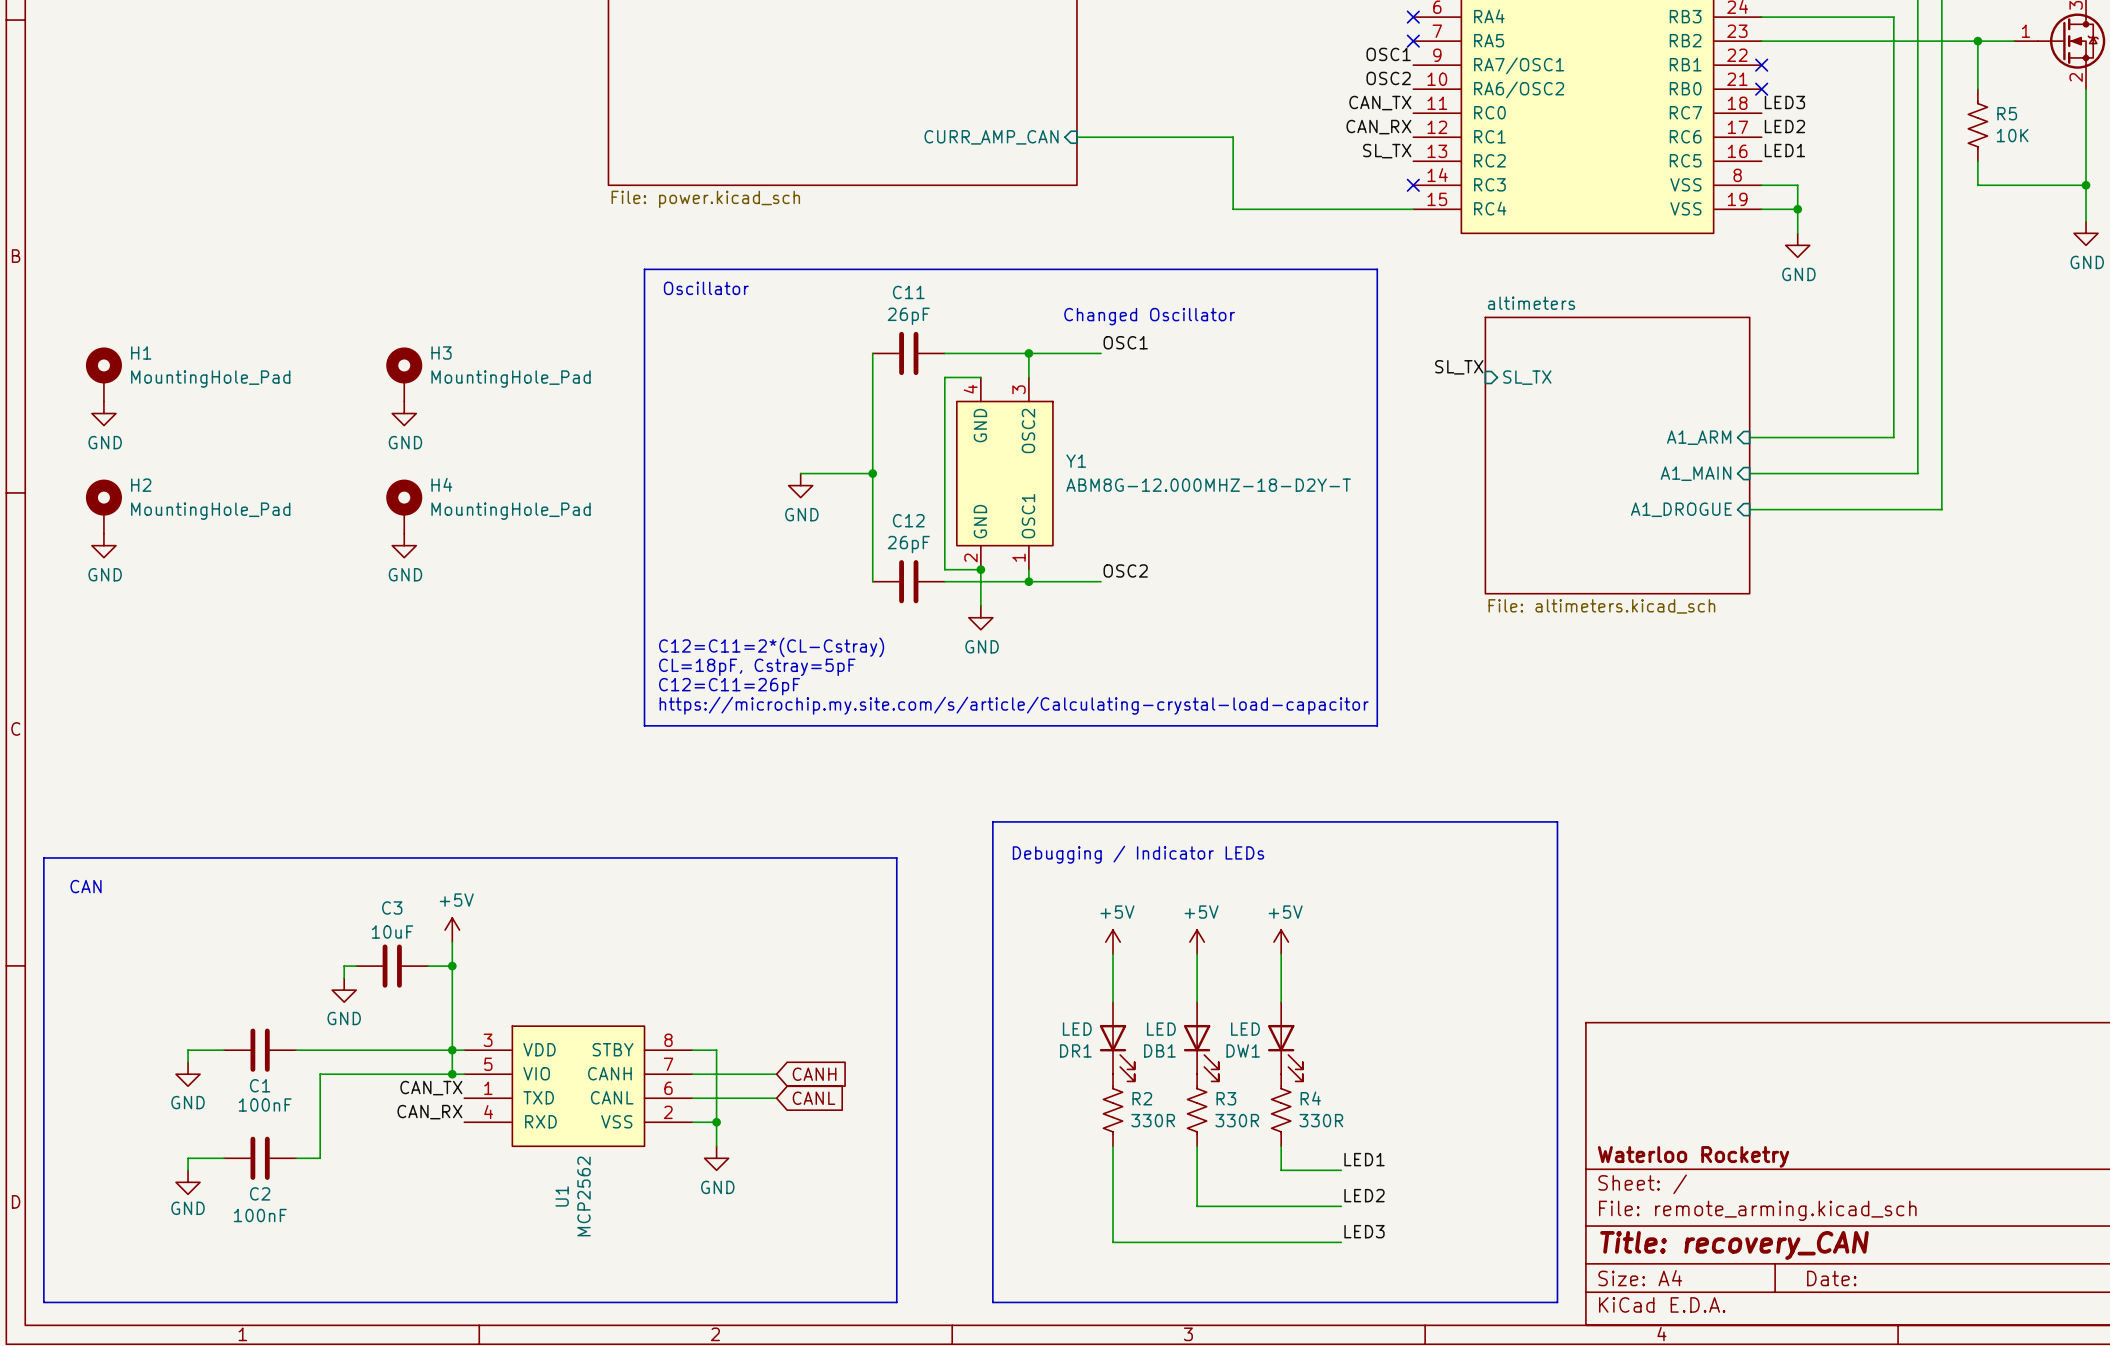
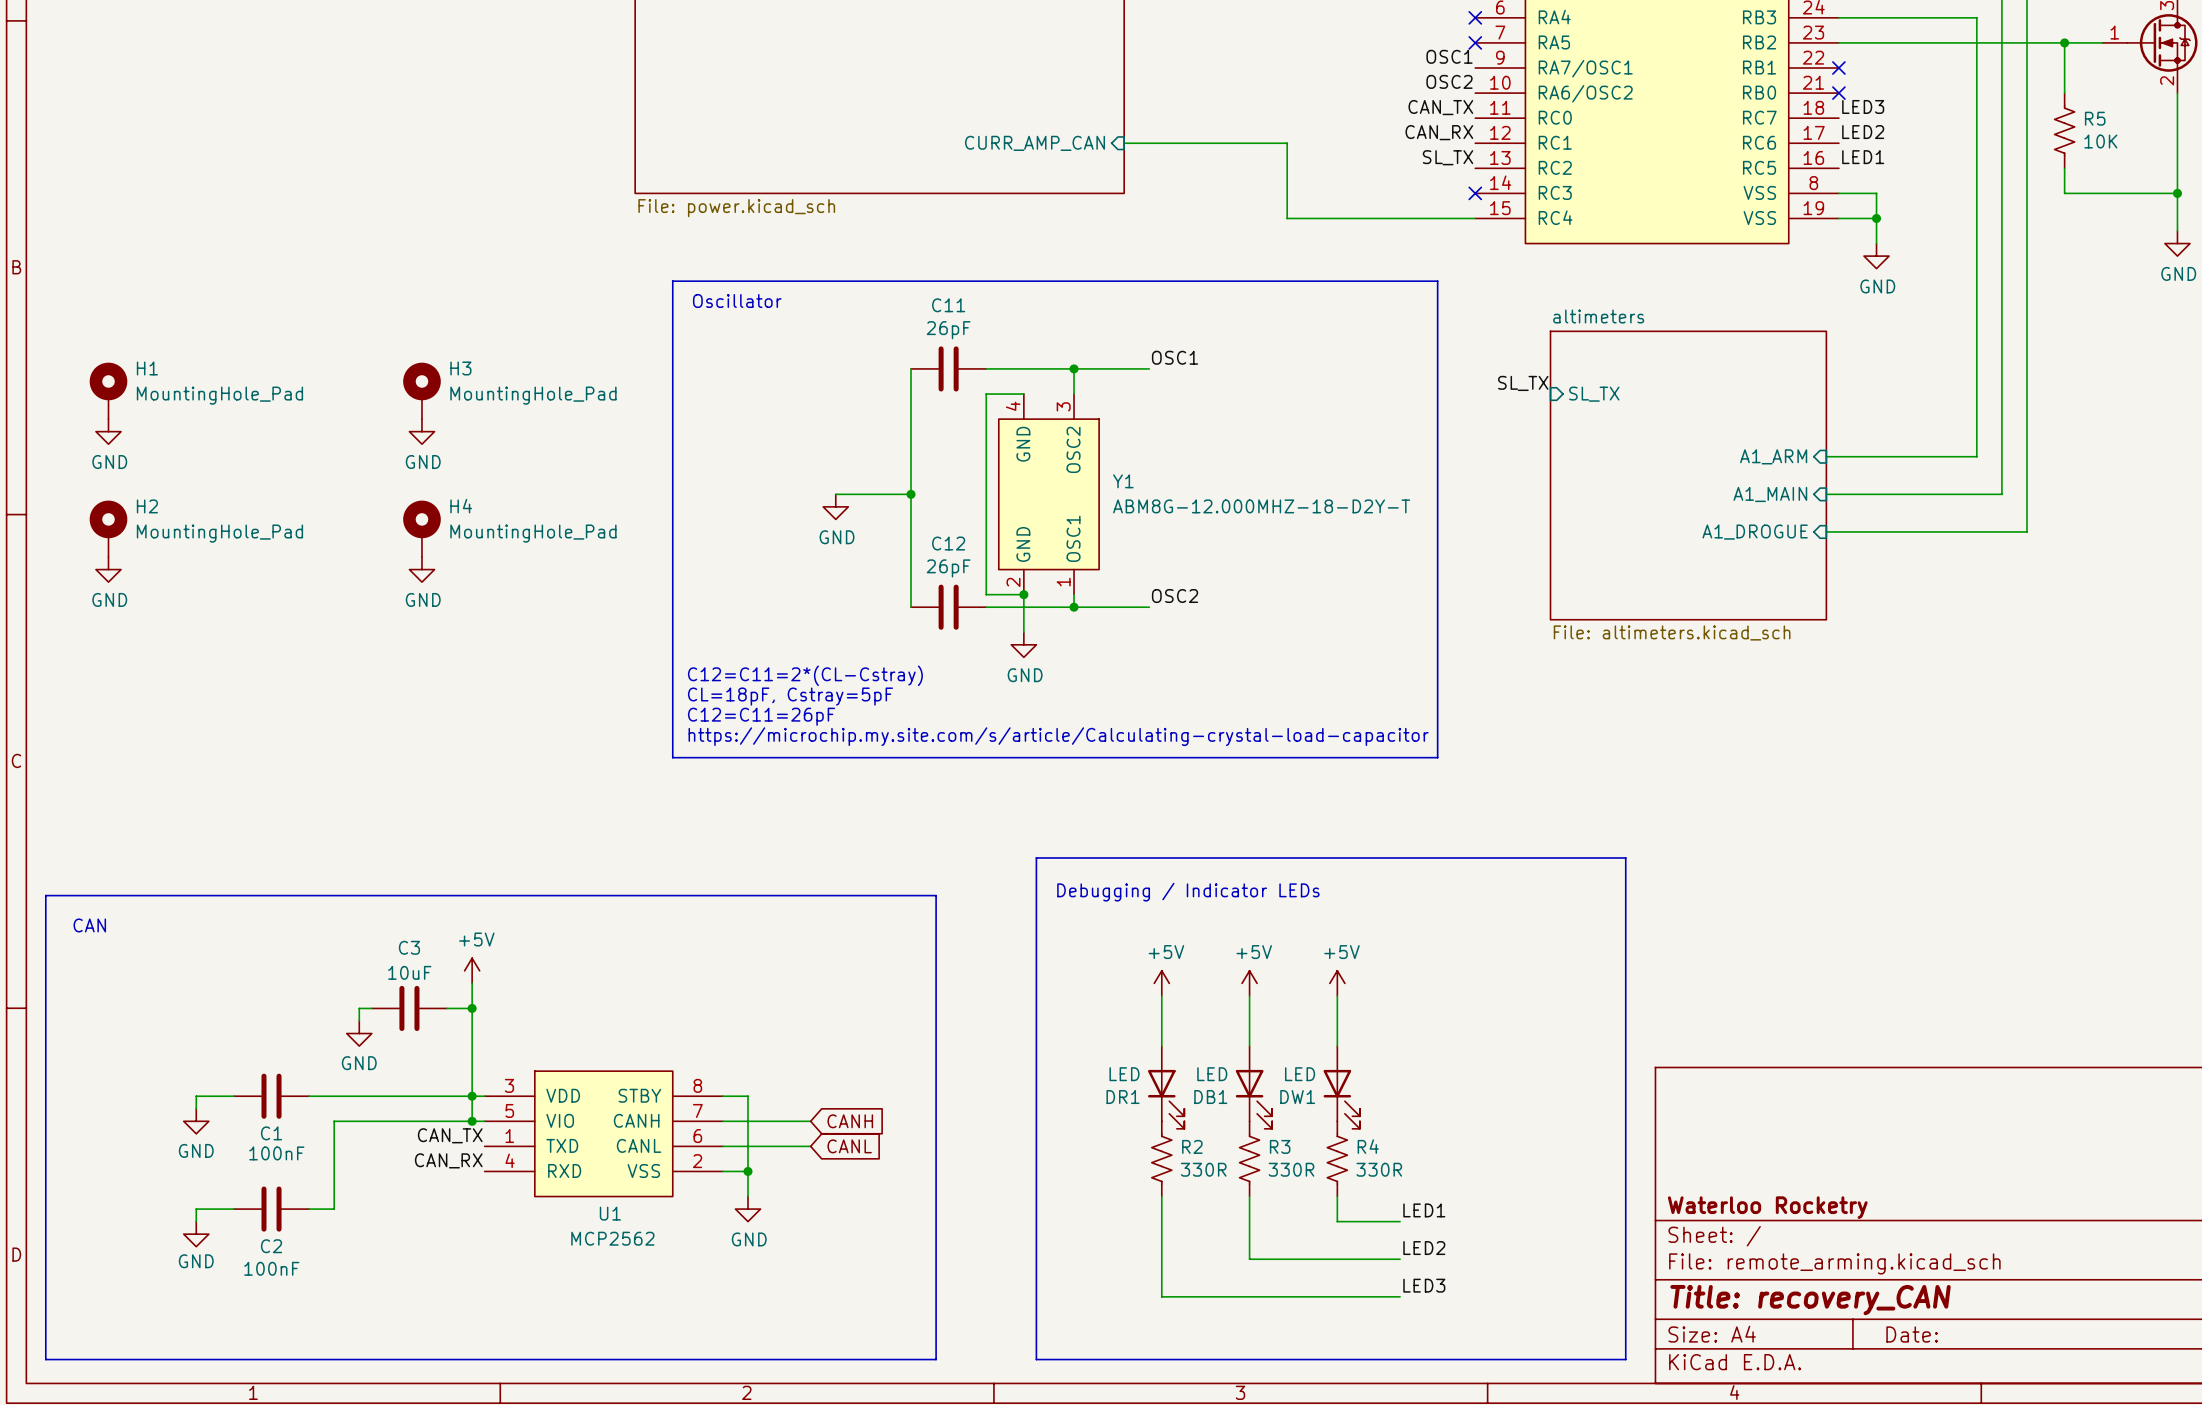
text: Changed Oscillator (1149, 316) -> none
U1 name rotation: 0° (562, 1196) -> 90° clockwise (610, 1213)
U1 name position: U1 (562, 1196) -> U1 (610, 1213)
U1 value rotation: 0° (583, 1196) -> 90° clockwise (612, 1238)

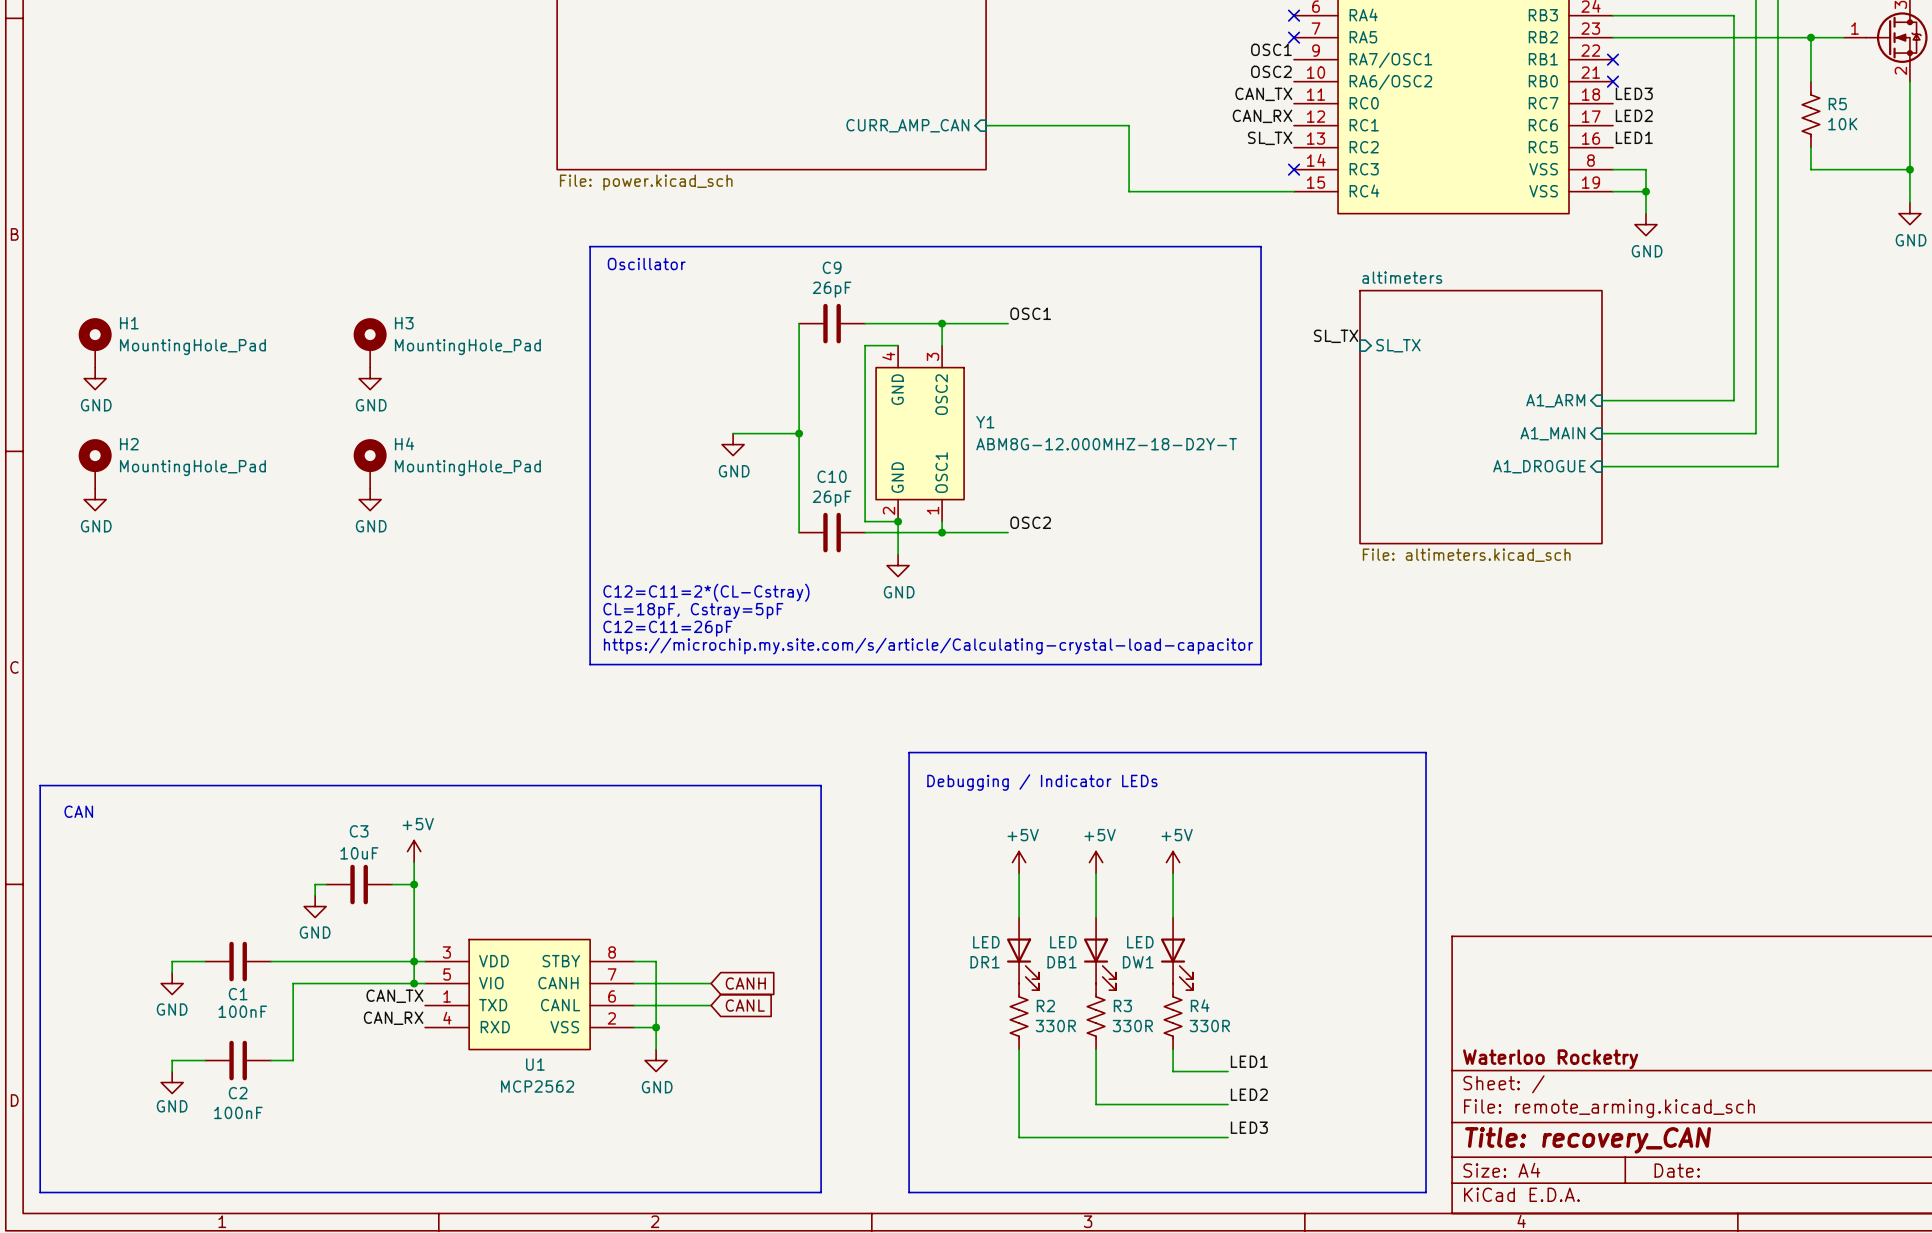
C11 name: C11 (948, 305) -> C9 (832, 267)
C12 name: C12 (948, 543) -> C10 (832, 476)

